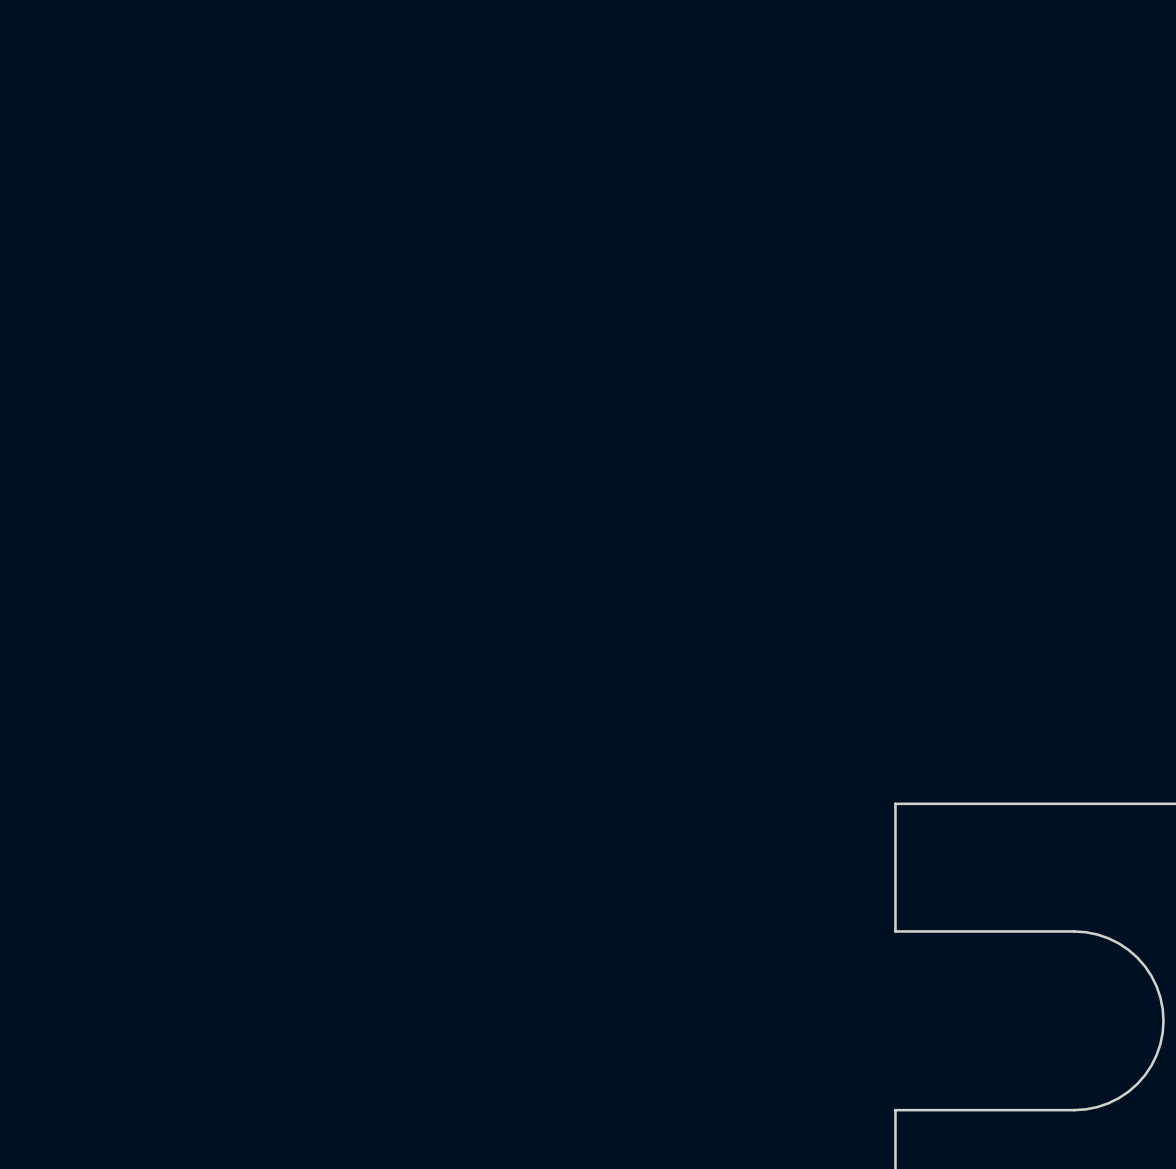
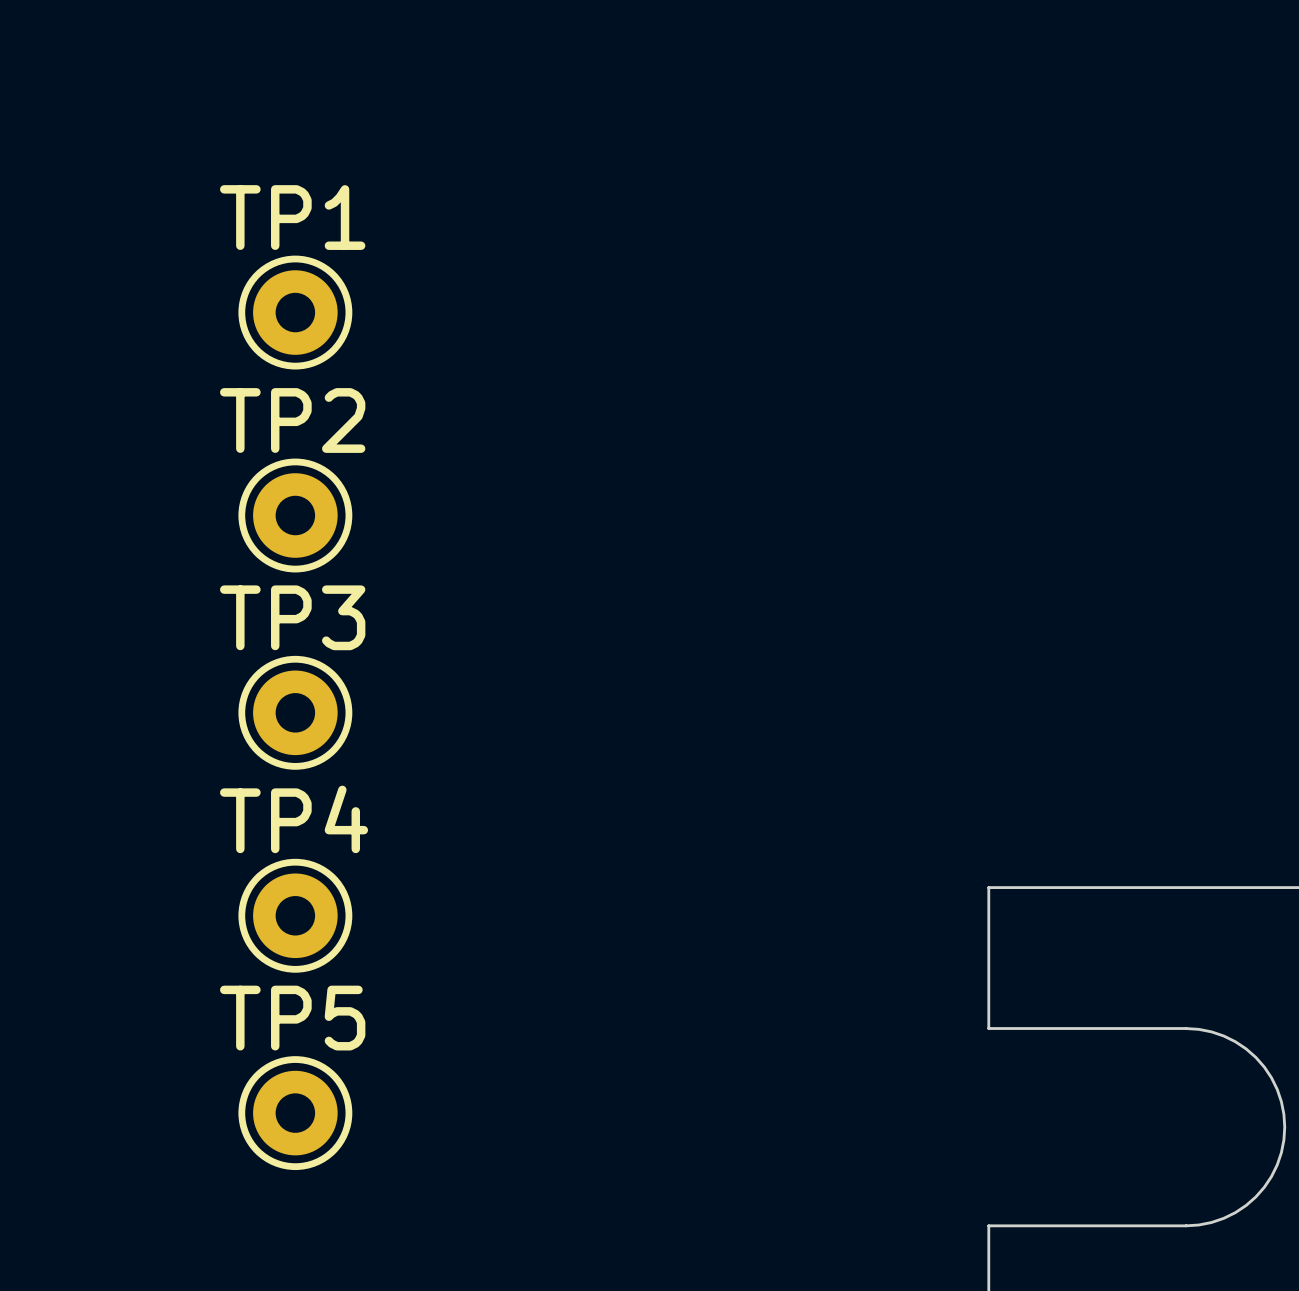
TP1: none -> (295, 312)
TP2: none -> (295, 515)
TP3: none -> (295, 712)
TP4: none -> (295, 915)
TP5: none -> (295, 1113)

